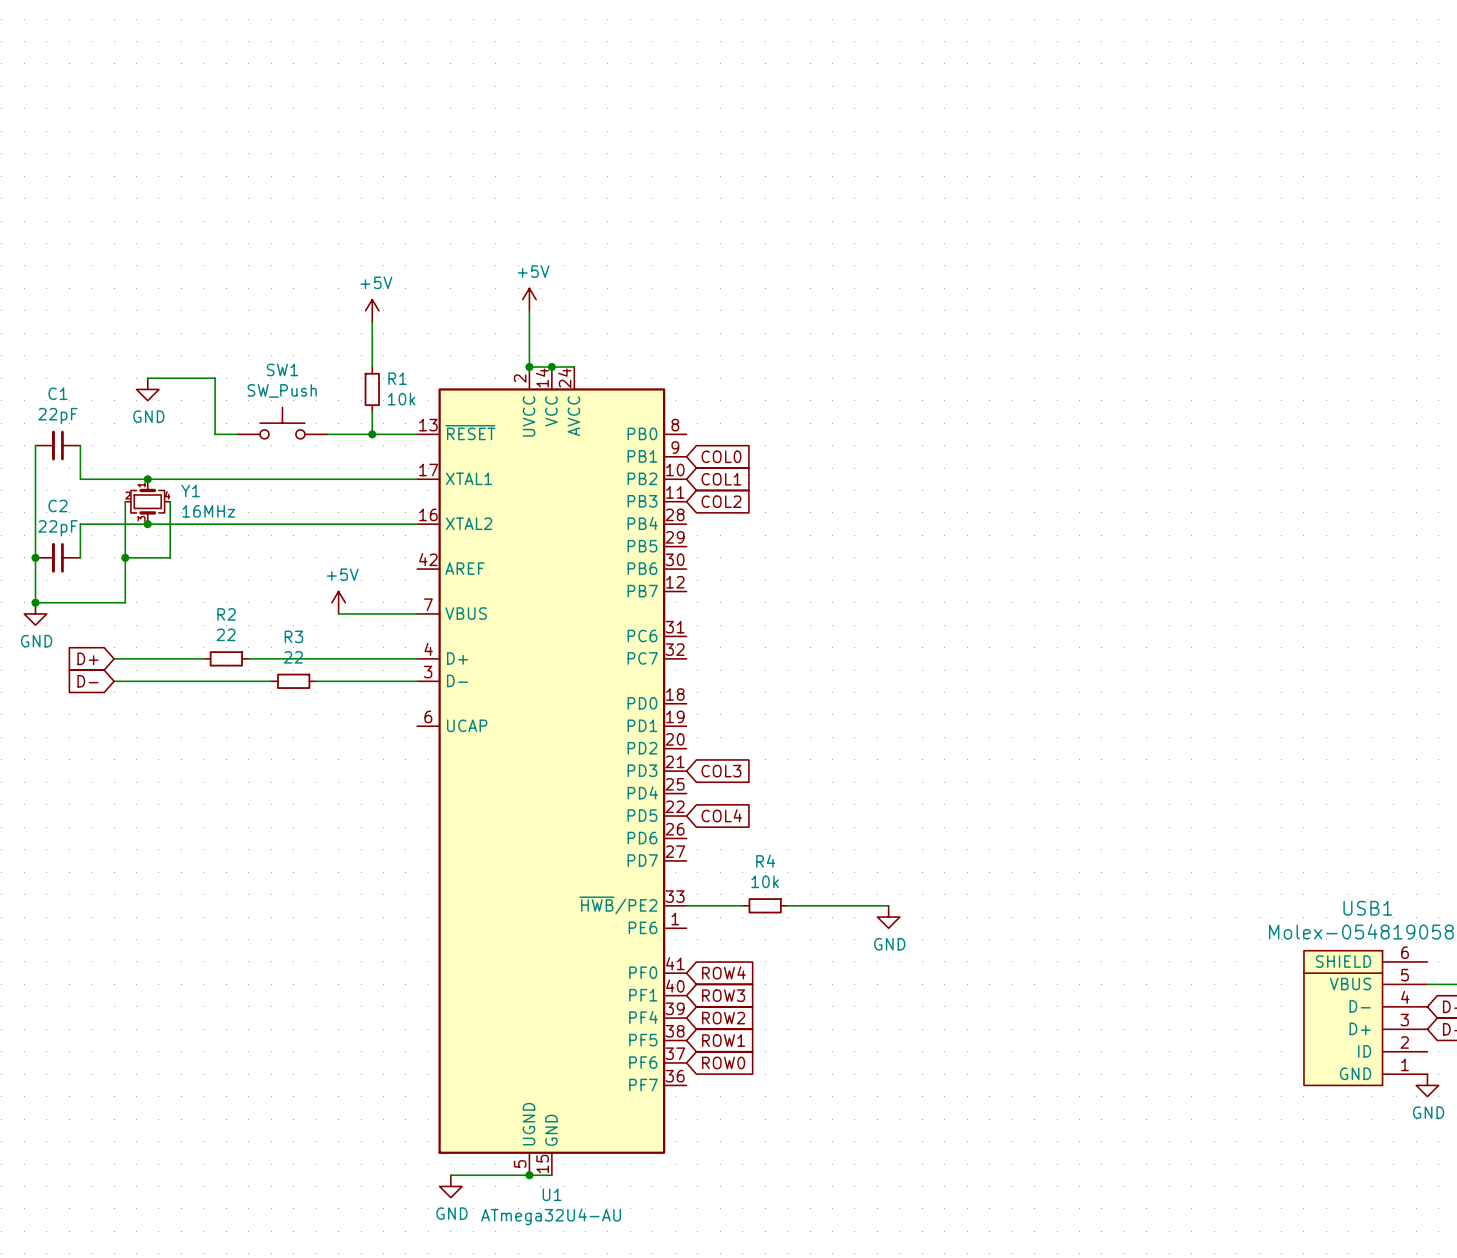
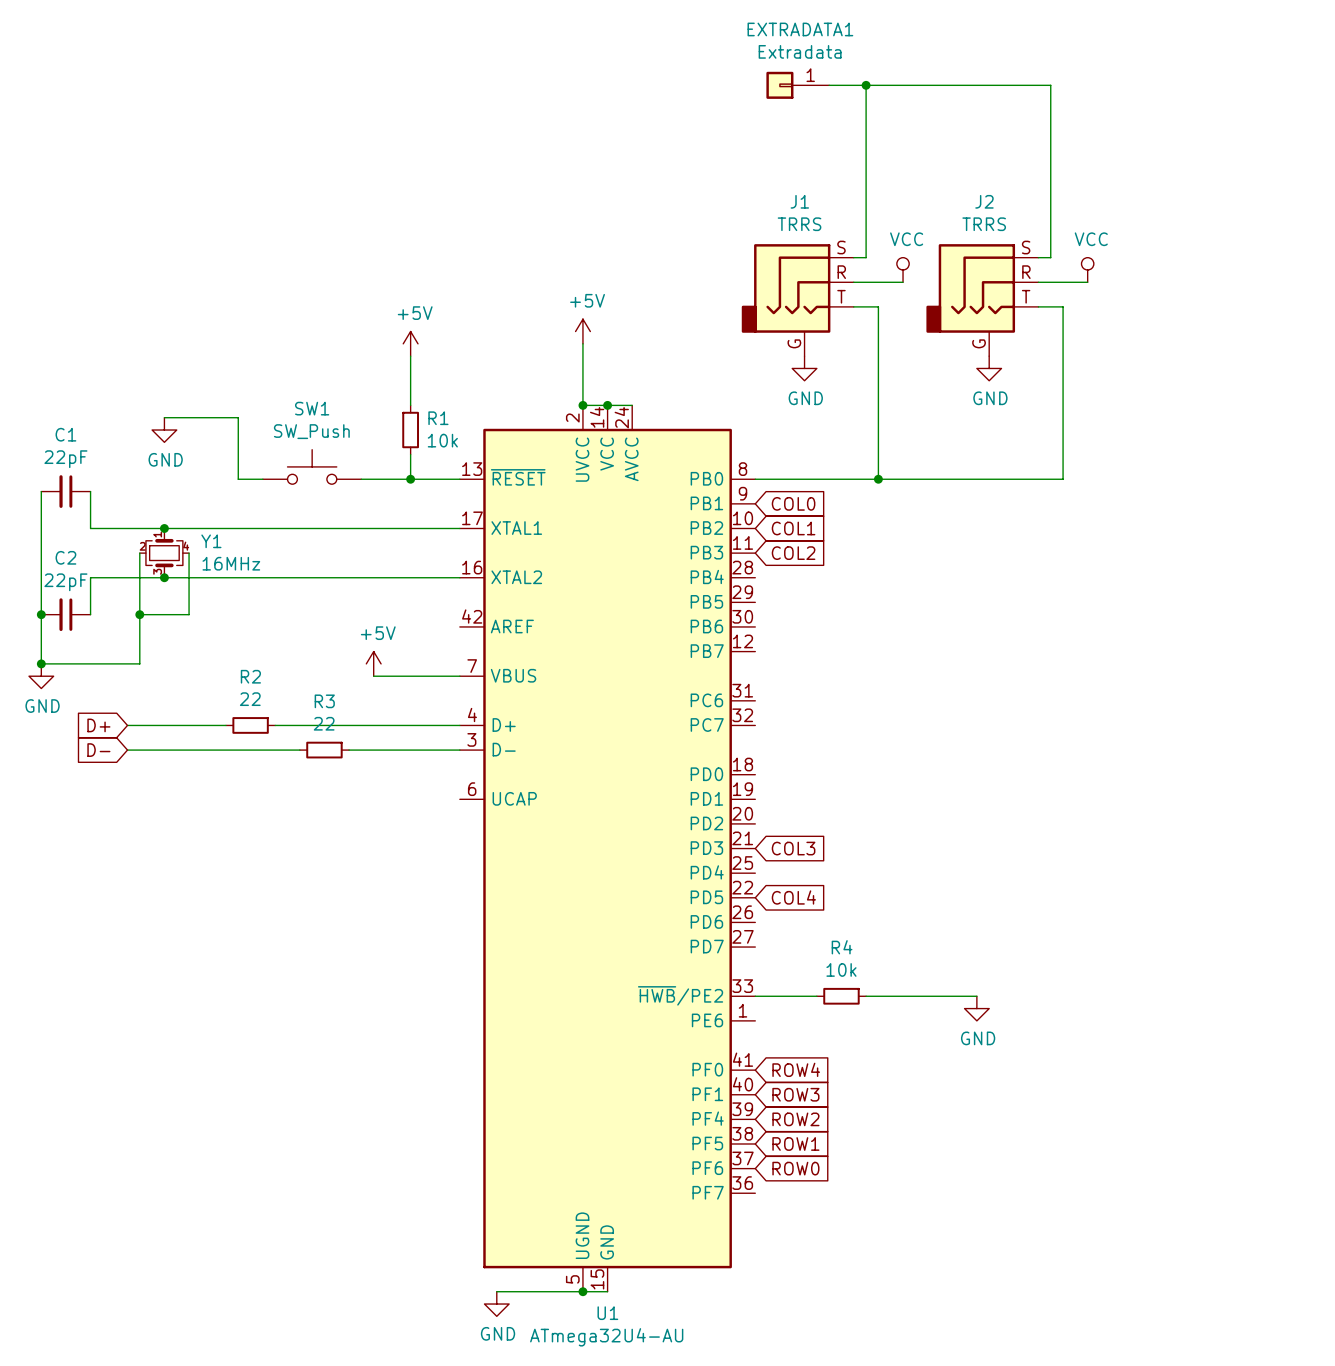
EXTRADATA1: none -> Extradata (797, 85)
wire: none -> (829, 85) (1050, 85) (1050, 257) (1038, 257)
wire: none -> (866, 85) (866, 257) (853, 257)
junction: none -> (866, 85)
power symbol: none -> VCC (903, 269)
power symbol: none -> VCC (1087, 269)
wire: none -> (853, 282) (903, 282)
wire: none -> (1038, 282) (1087, 282)
J1: none -> TRRS (797, 300)
J2: none -> TRRS (982, 300)
wire: none -> (853, 306) (878, 306) (878, 479)
wire: none -> (1038, 306) (1063, 306) (1063, 479) (755, 479)
power symbol: none -> GND (804, 368)
power symbol: none -> GND (989, 368)
junction: none -> (878, 479)

